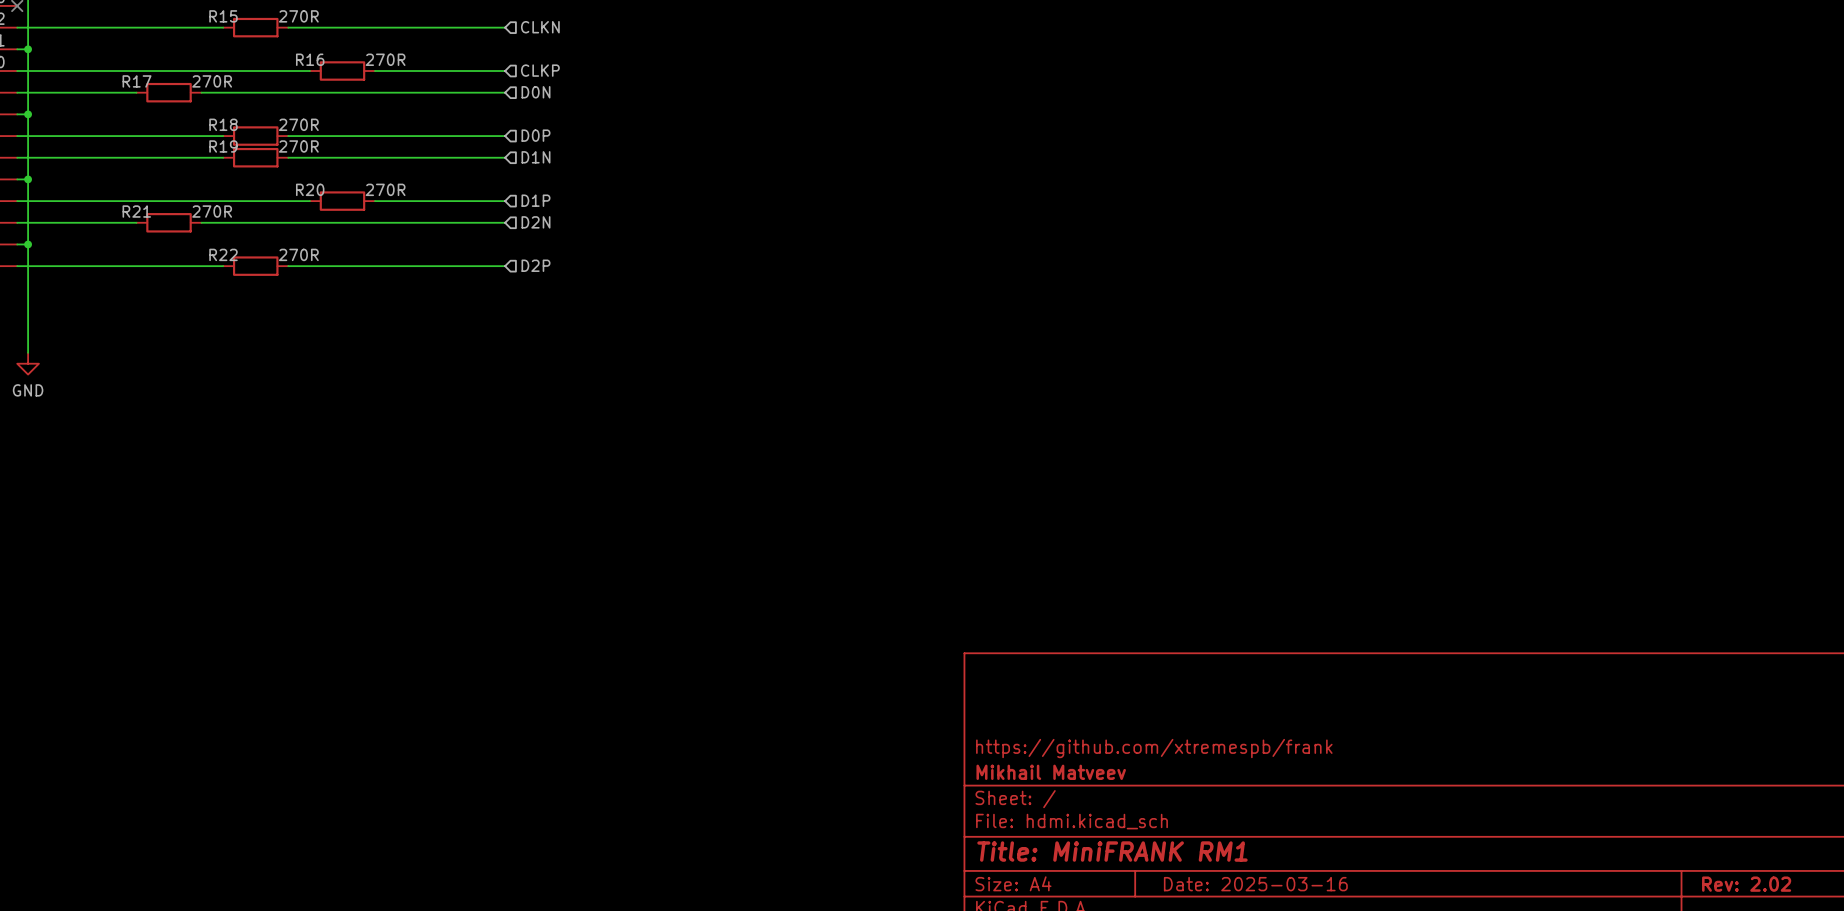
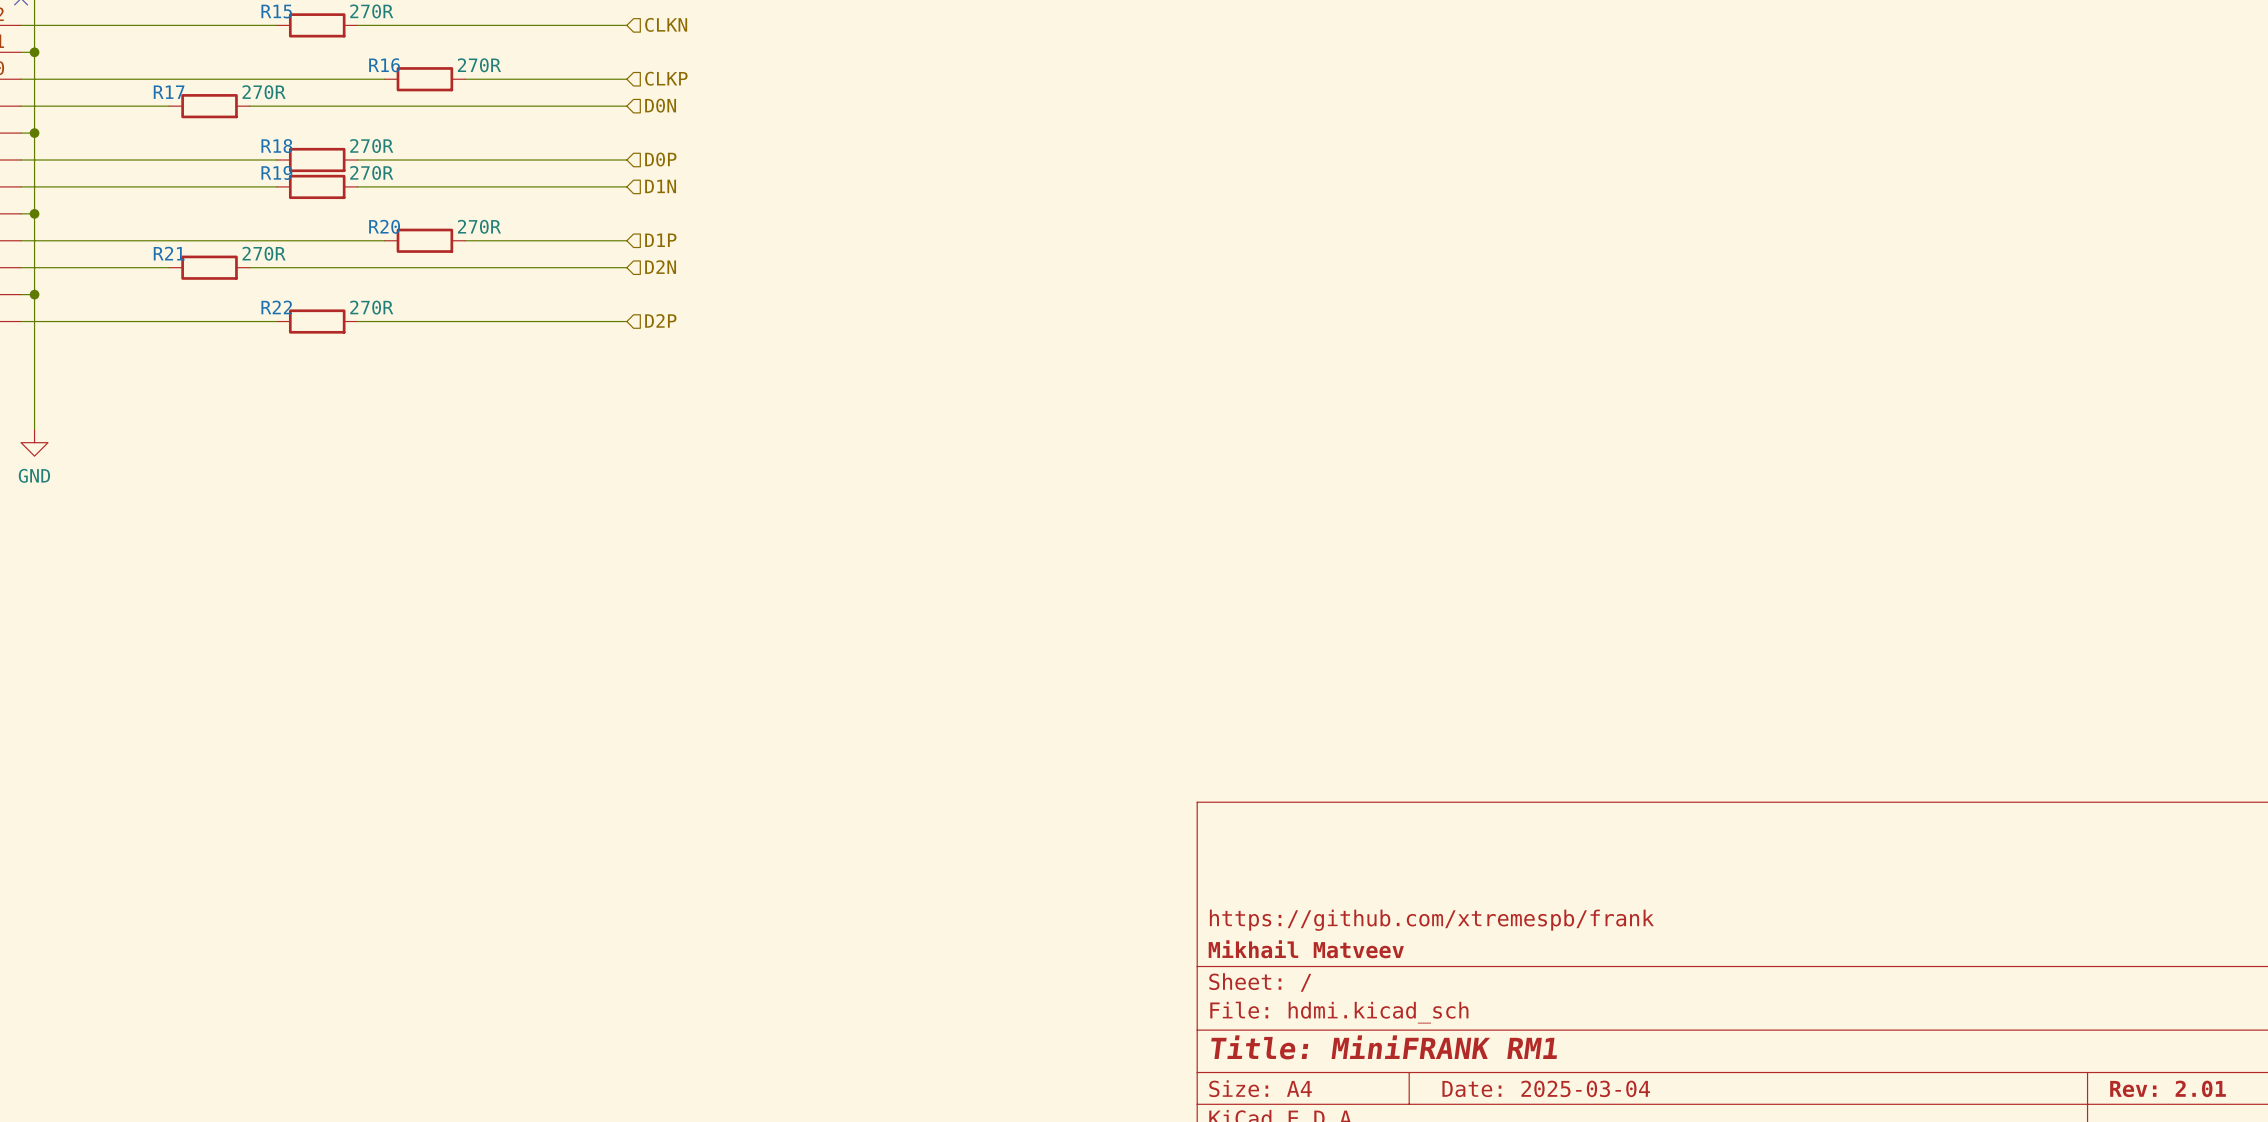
title block: Date: 2025-03-16 (1255, 884) -> Date: 2025-03-04 (1546, 1088)
title block: Rev: 2.02 (1746, 884) -> Rev: 2.01 (2168, 1088)

